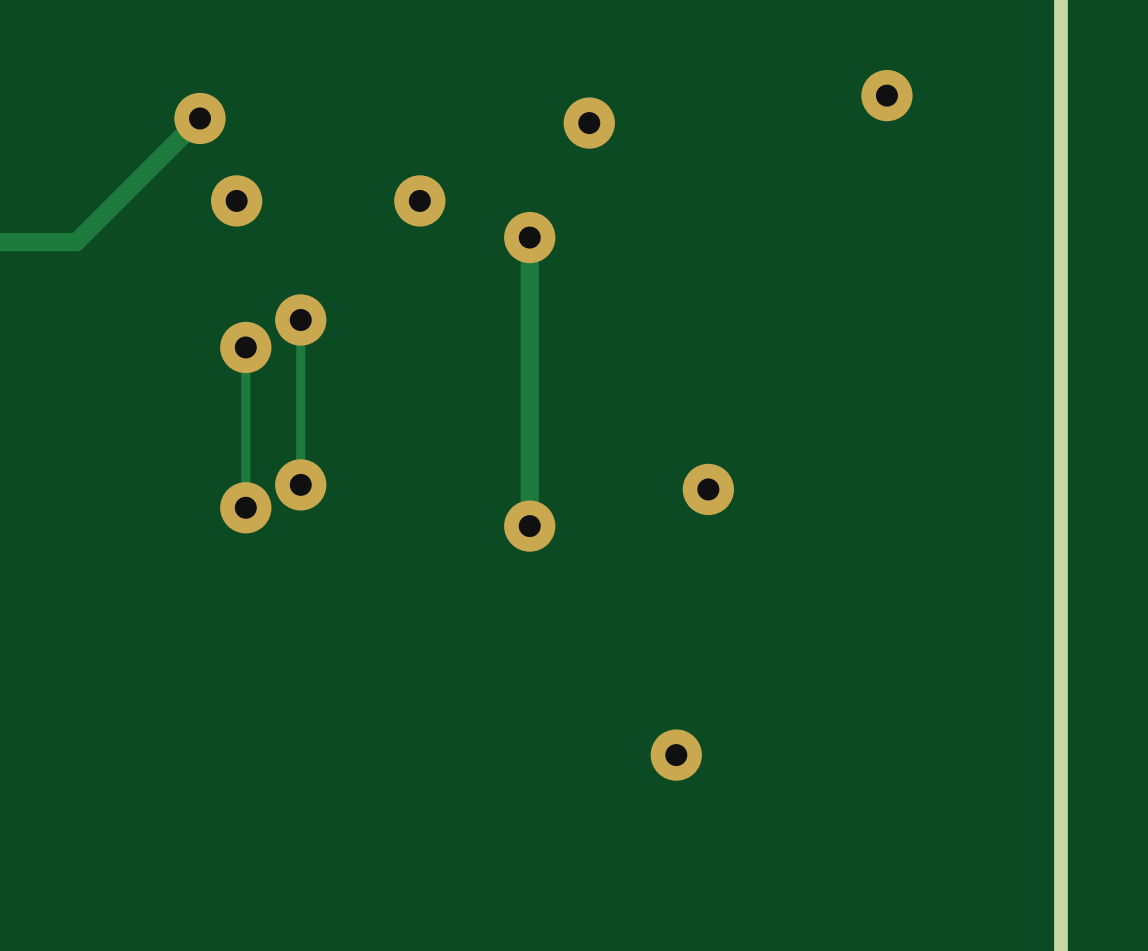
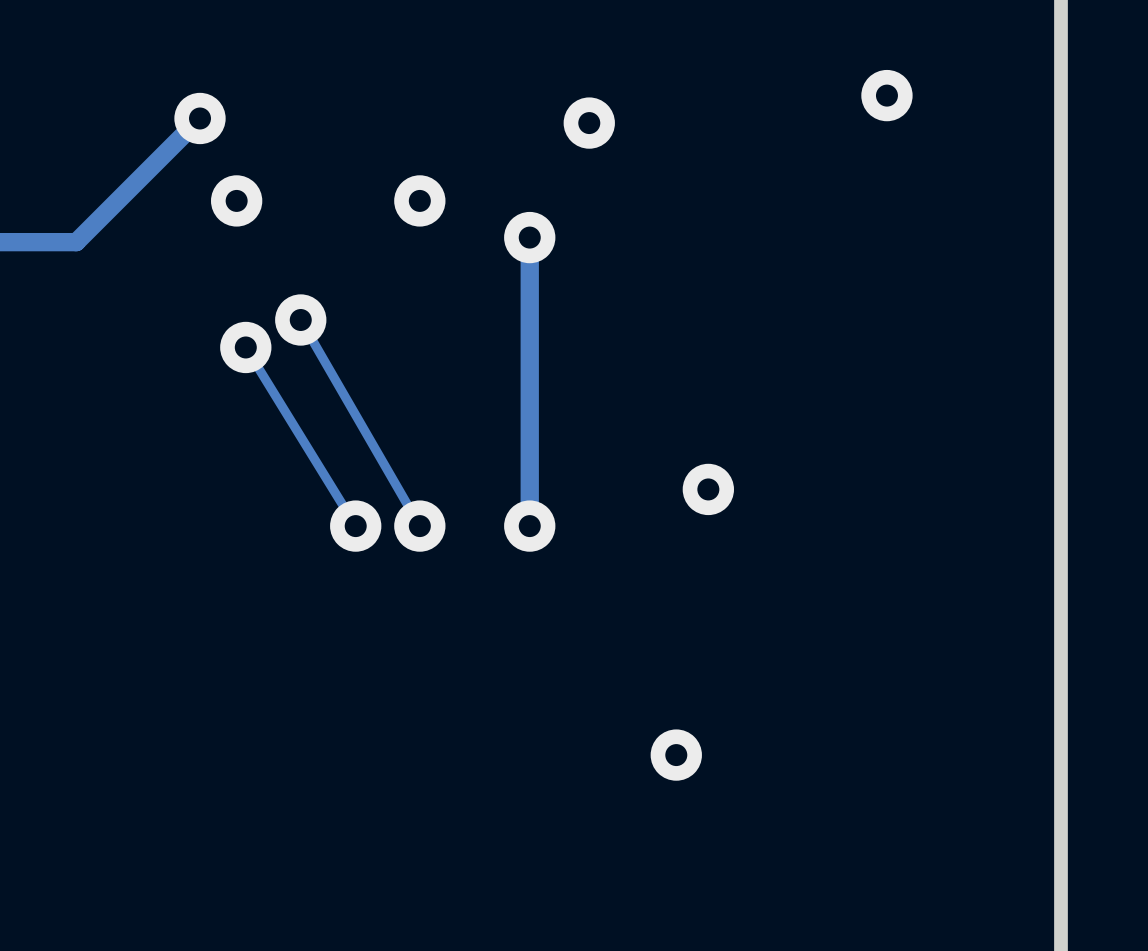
track: (300, 320) (300, 484) -> (300, 320) (419, 526)
track: (245, 347) (245, 507) -> (245, 347) (355, 526)
via: (300, 484) -> none
via: (245, 507) -> none
via: none -> (355, 526)
via: none -> (419, 526)

